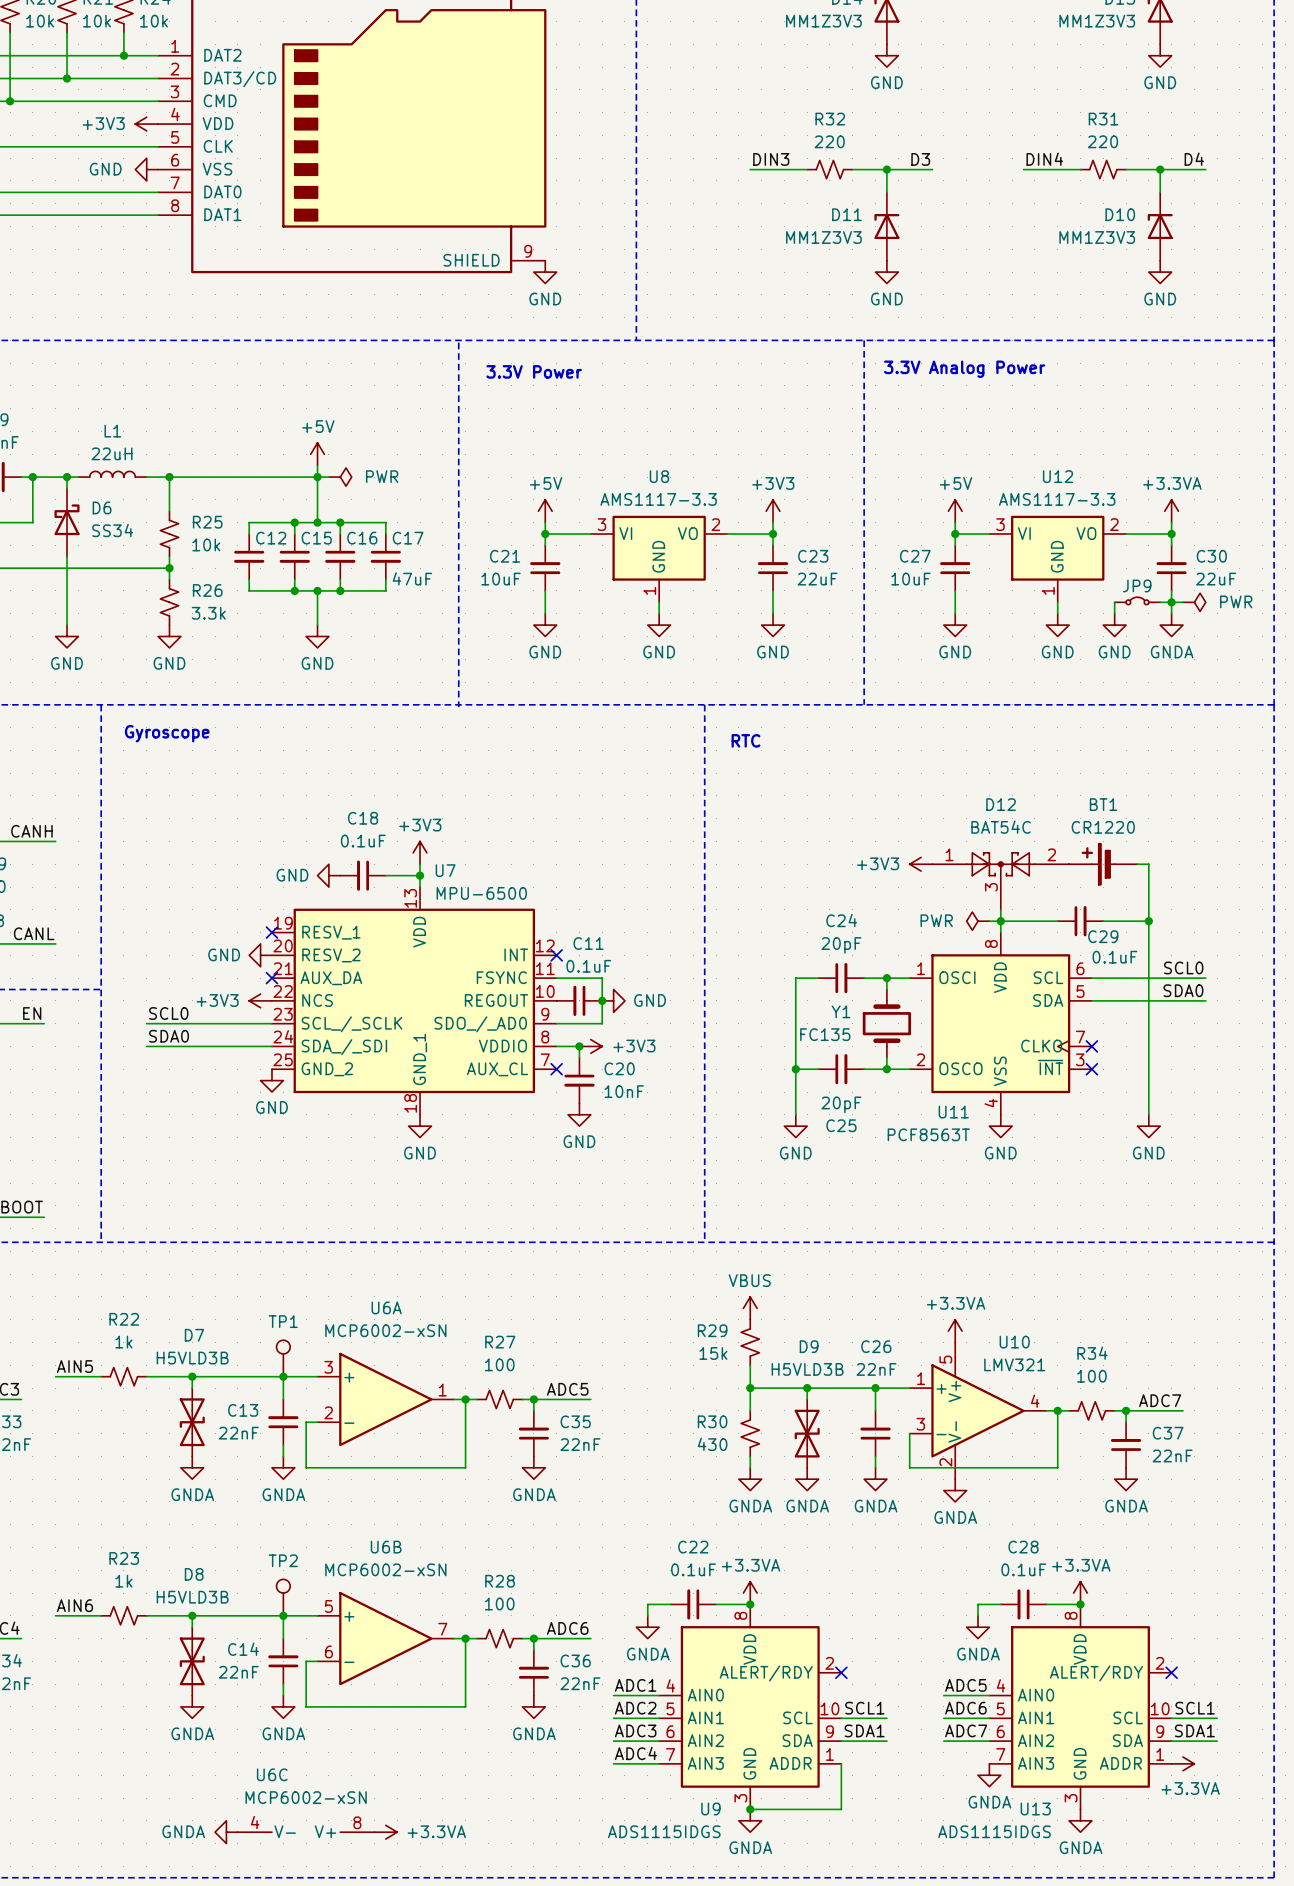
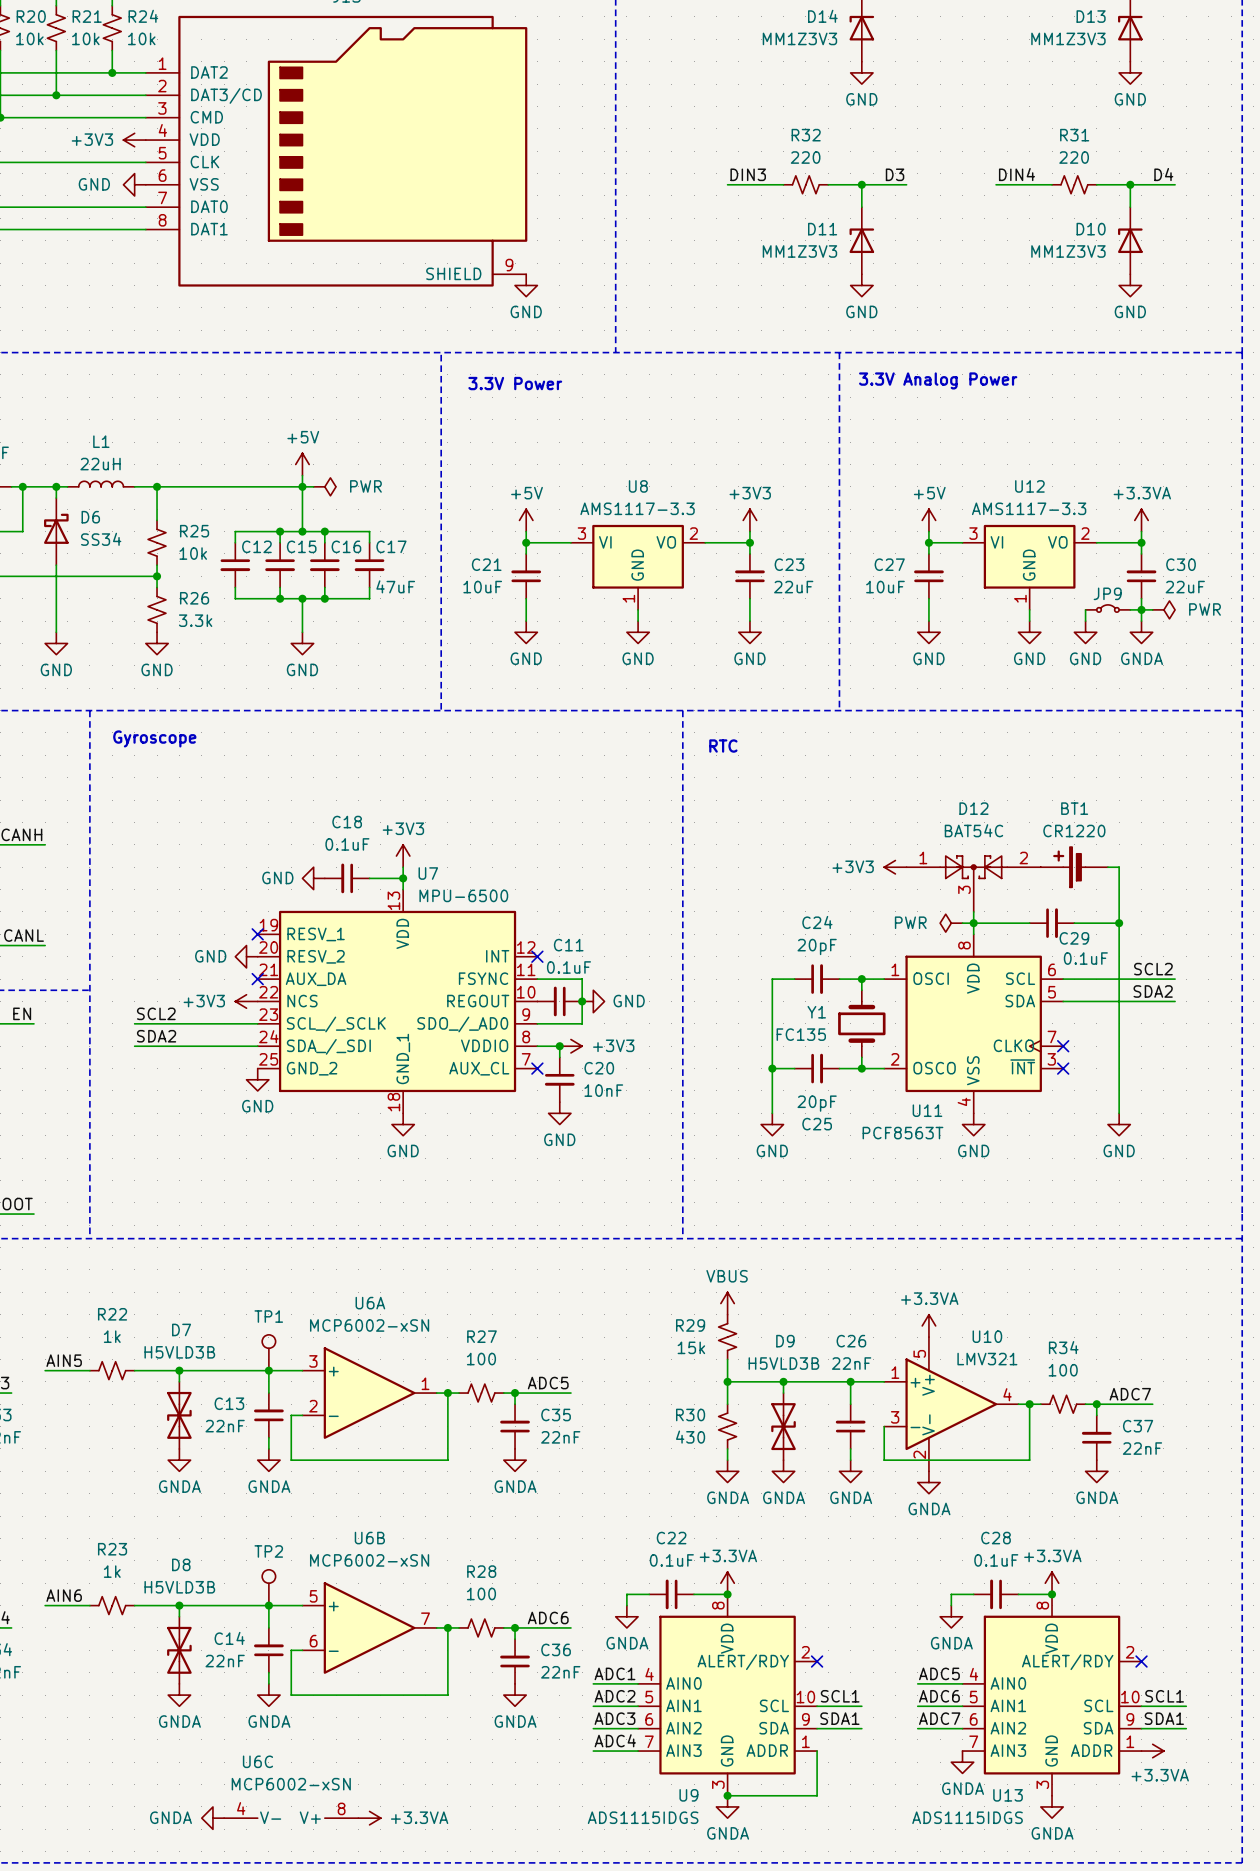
label: SCL0 (1183, 967) -> SCL2 (1153, 969)
label: SDA0 (1183, 990) -> SDA2 (1153, 991)
label: SCL0 (168, 1013) -> SCL2 (156, 1013)
label: SDA0 (169, 1036) -> SDA2 (156, 1036)

